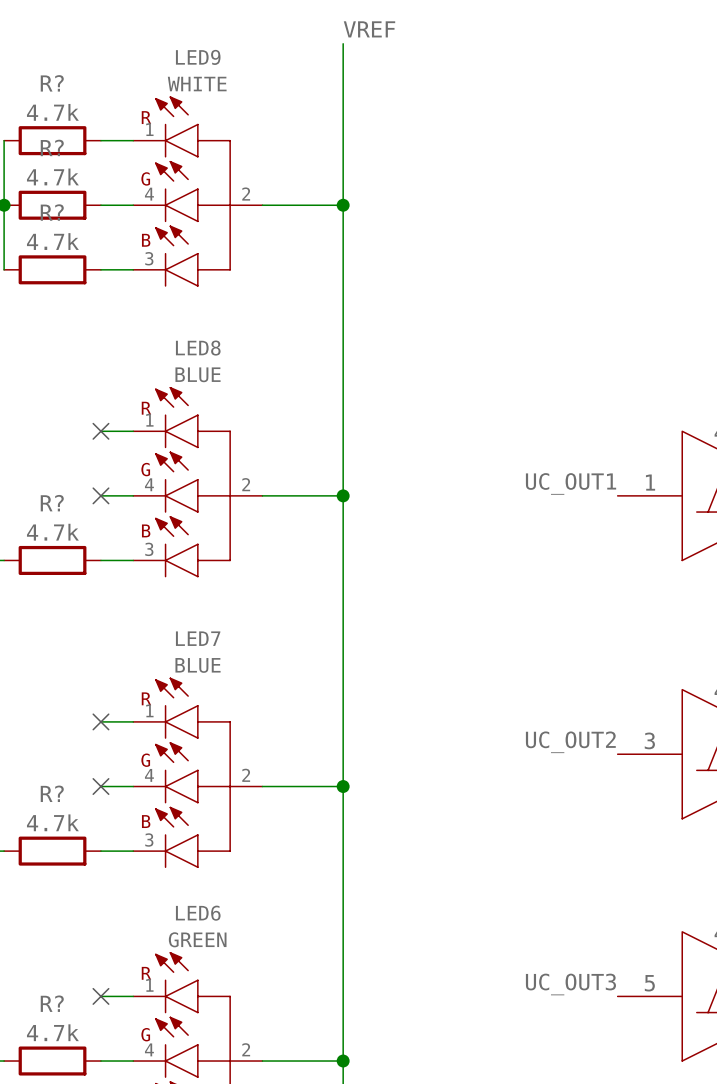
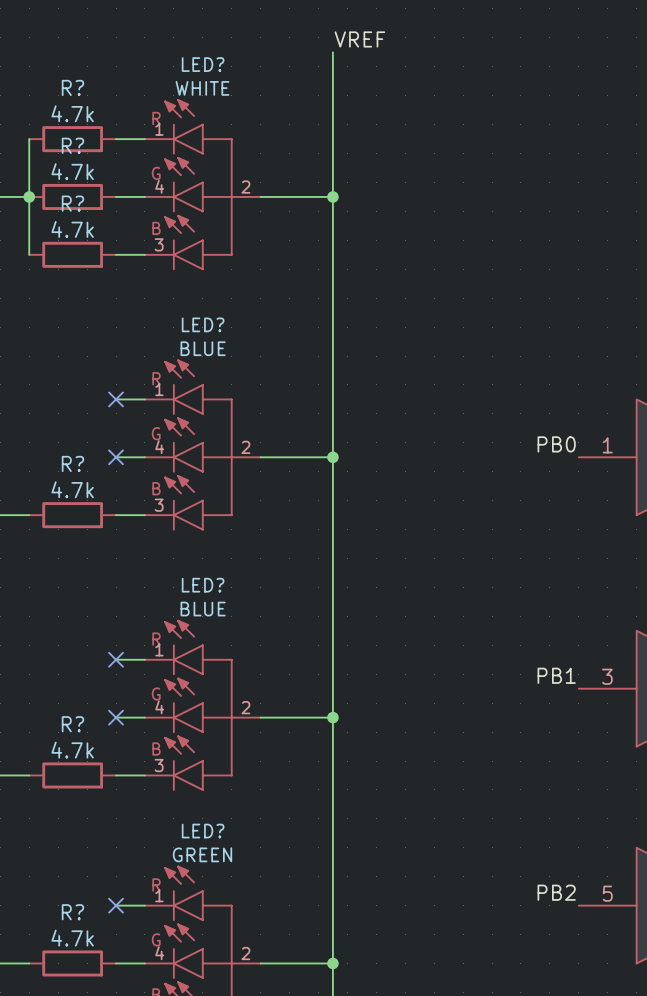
LED9 name: LED9 (198, 57) -> LED? (203, 64)
LED8 name: LED8 (198, 348) -> LED? (203, 324)
label: UC_OUT1 (571, 483) -> PB0 (556, 444)
LED7 name: LED7 (198, 638) -> LED? (203, 585)
label: UC_OUT2 (570, 742) -> PB1 (556, 675)
LED6 name: LED6 (198, 913) -> LED? (203, 831)
label: UC_OUT3 (570, 984) -> PB2 (556, 892)

